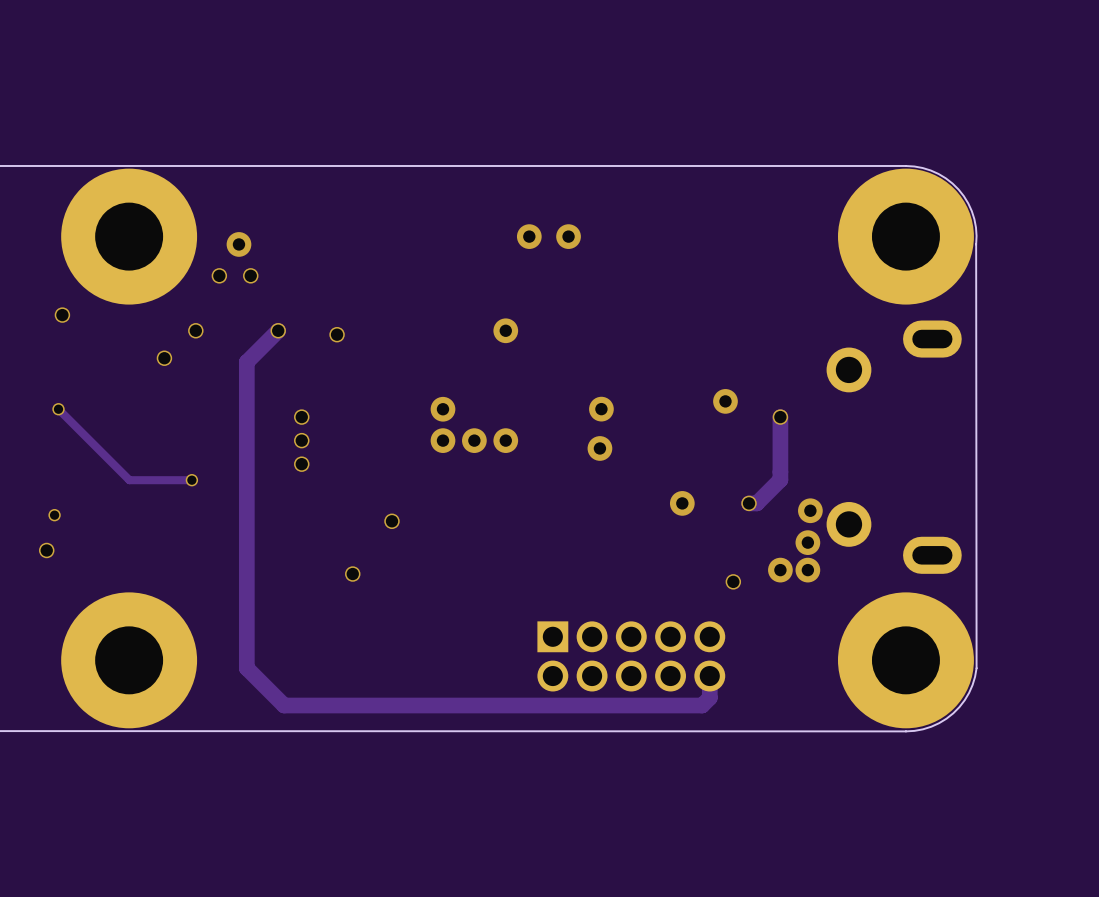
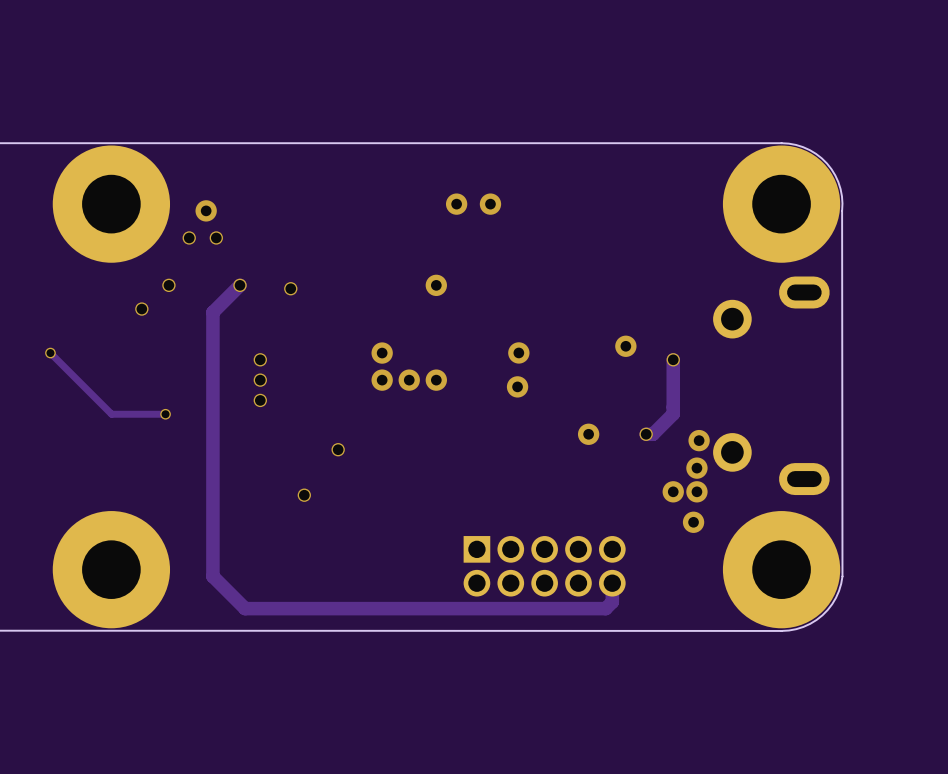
via: (62, 315) -> none
via: (54, 515) -> none
via: (46, 550) -> none
via: (733, 581) -> none
via: none -> (693, 522)

